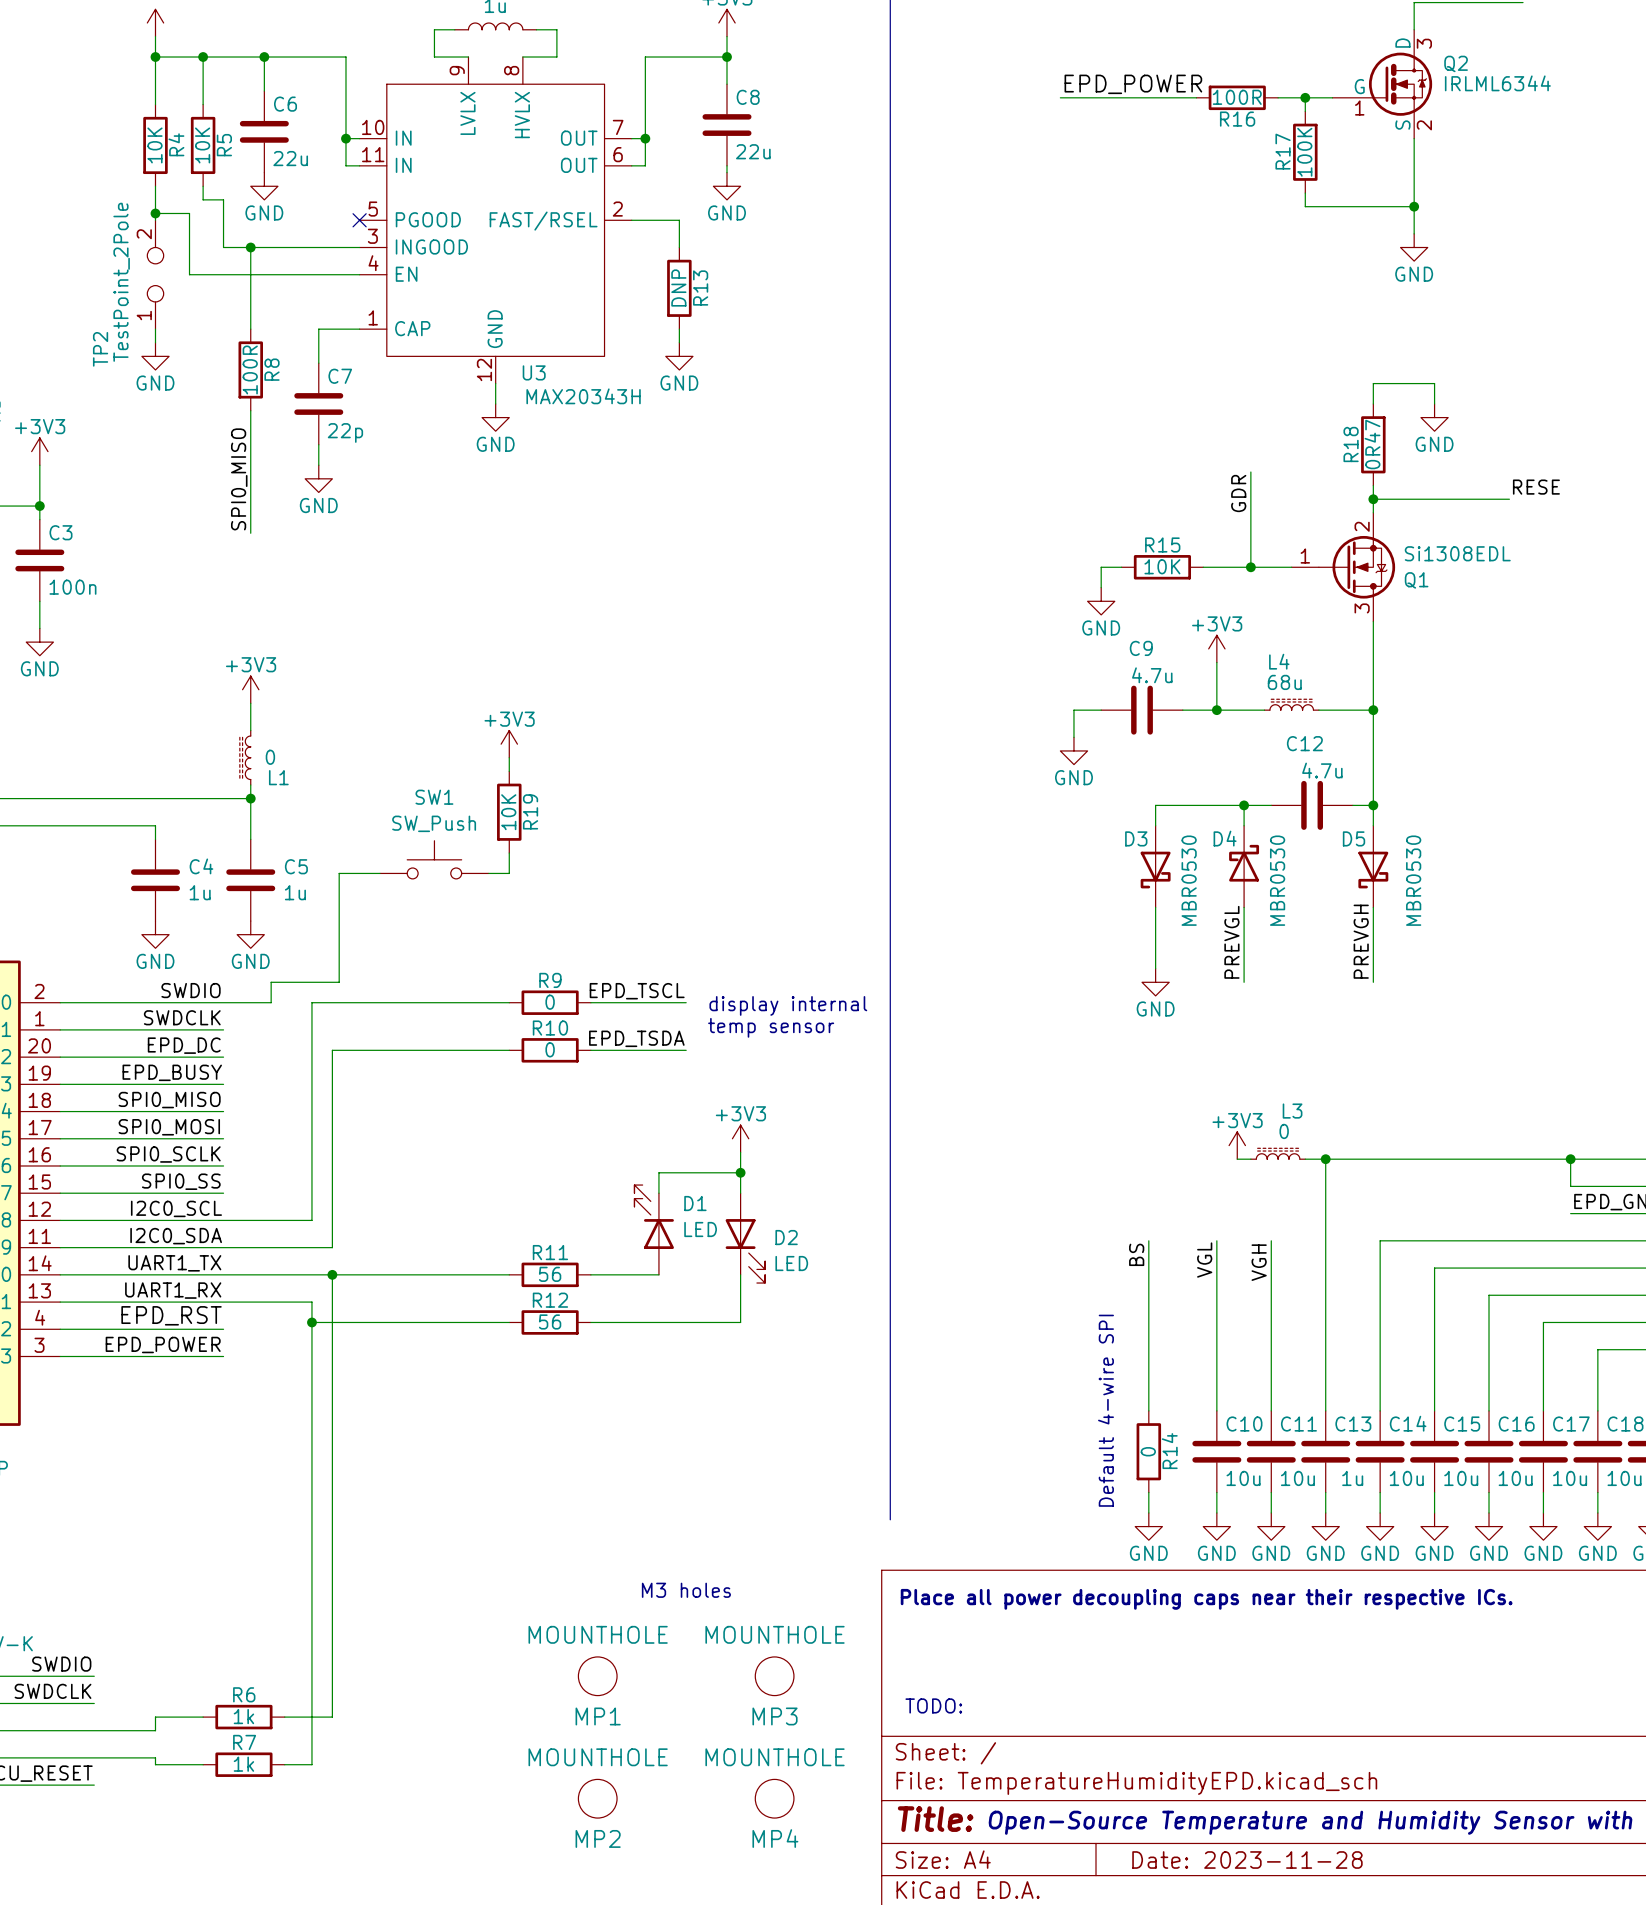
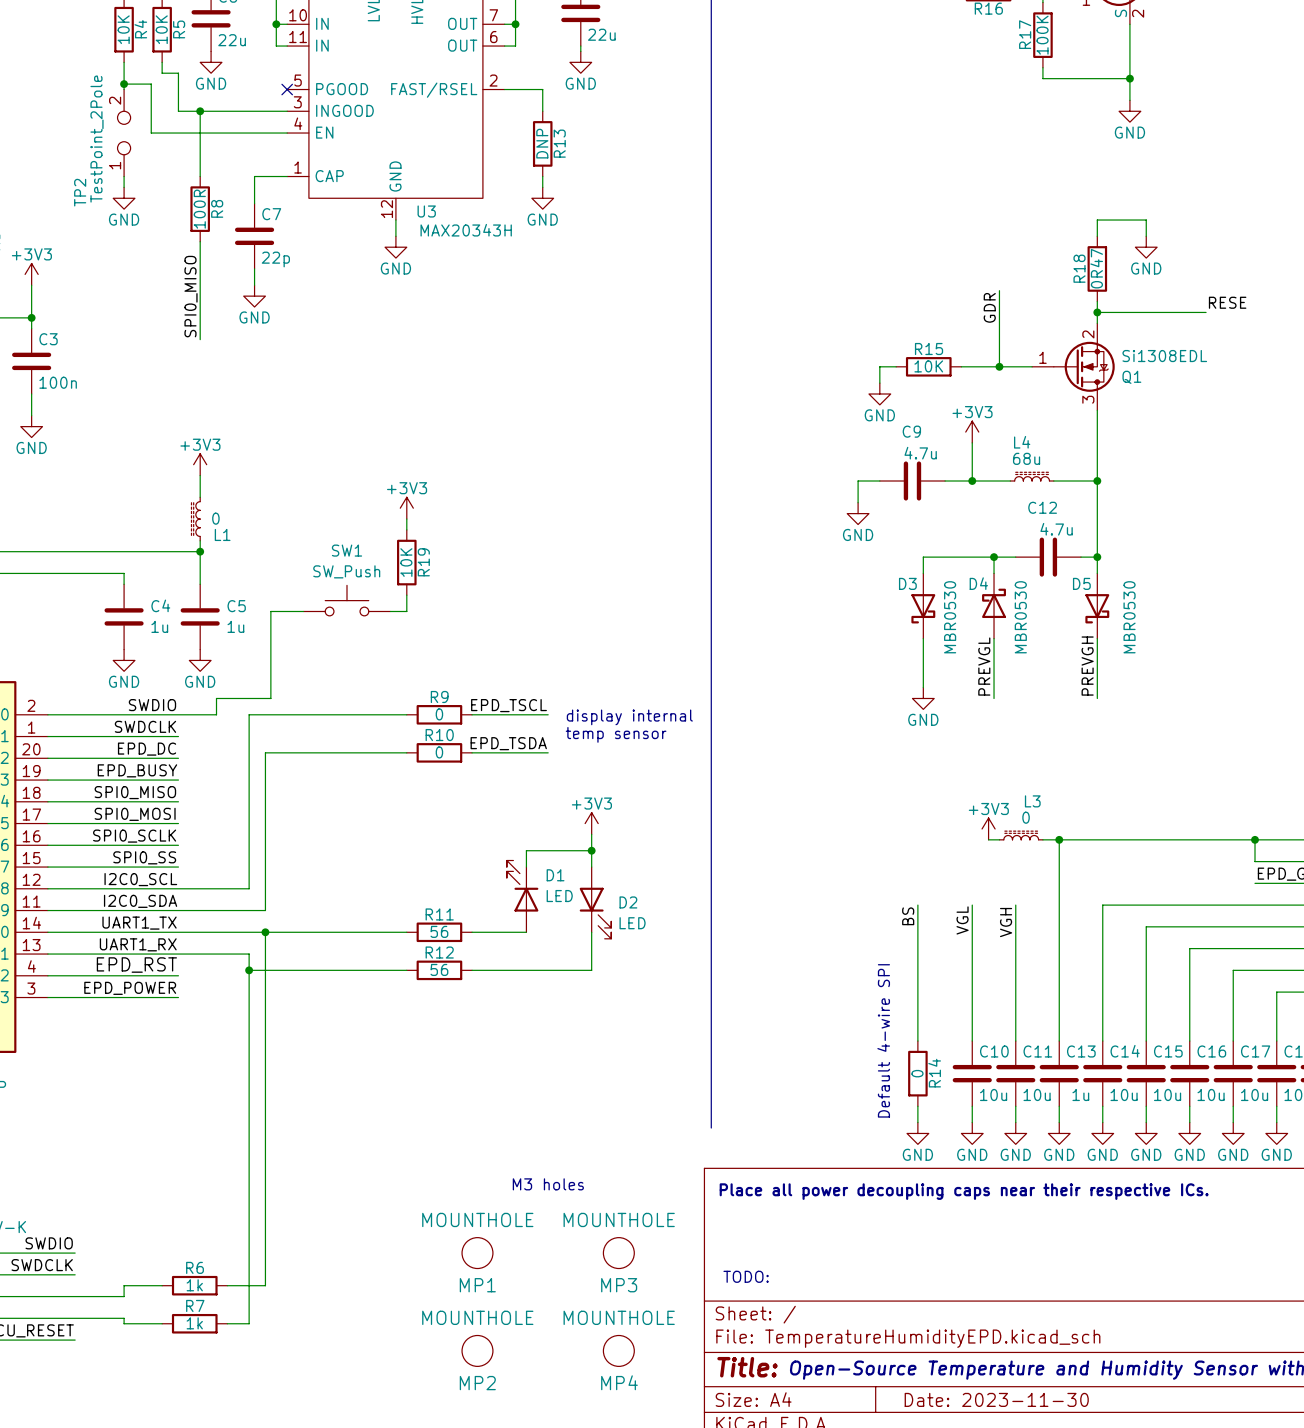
title block: Date: 2023-11-28 (1247, 1860) -> Date: 2023-11-30 (996, 1399)

